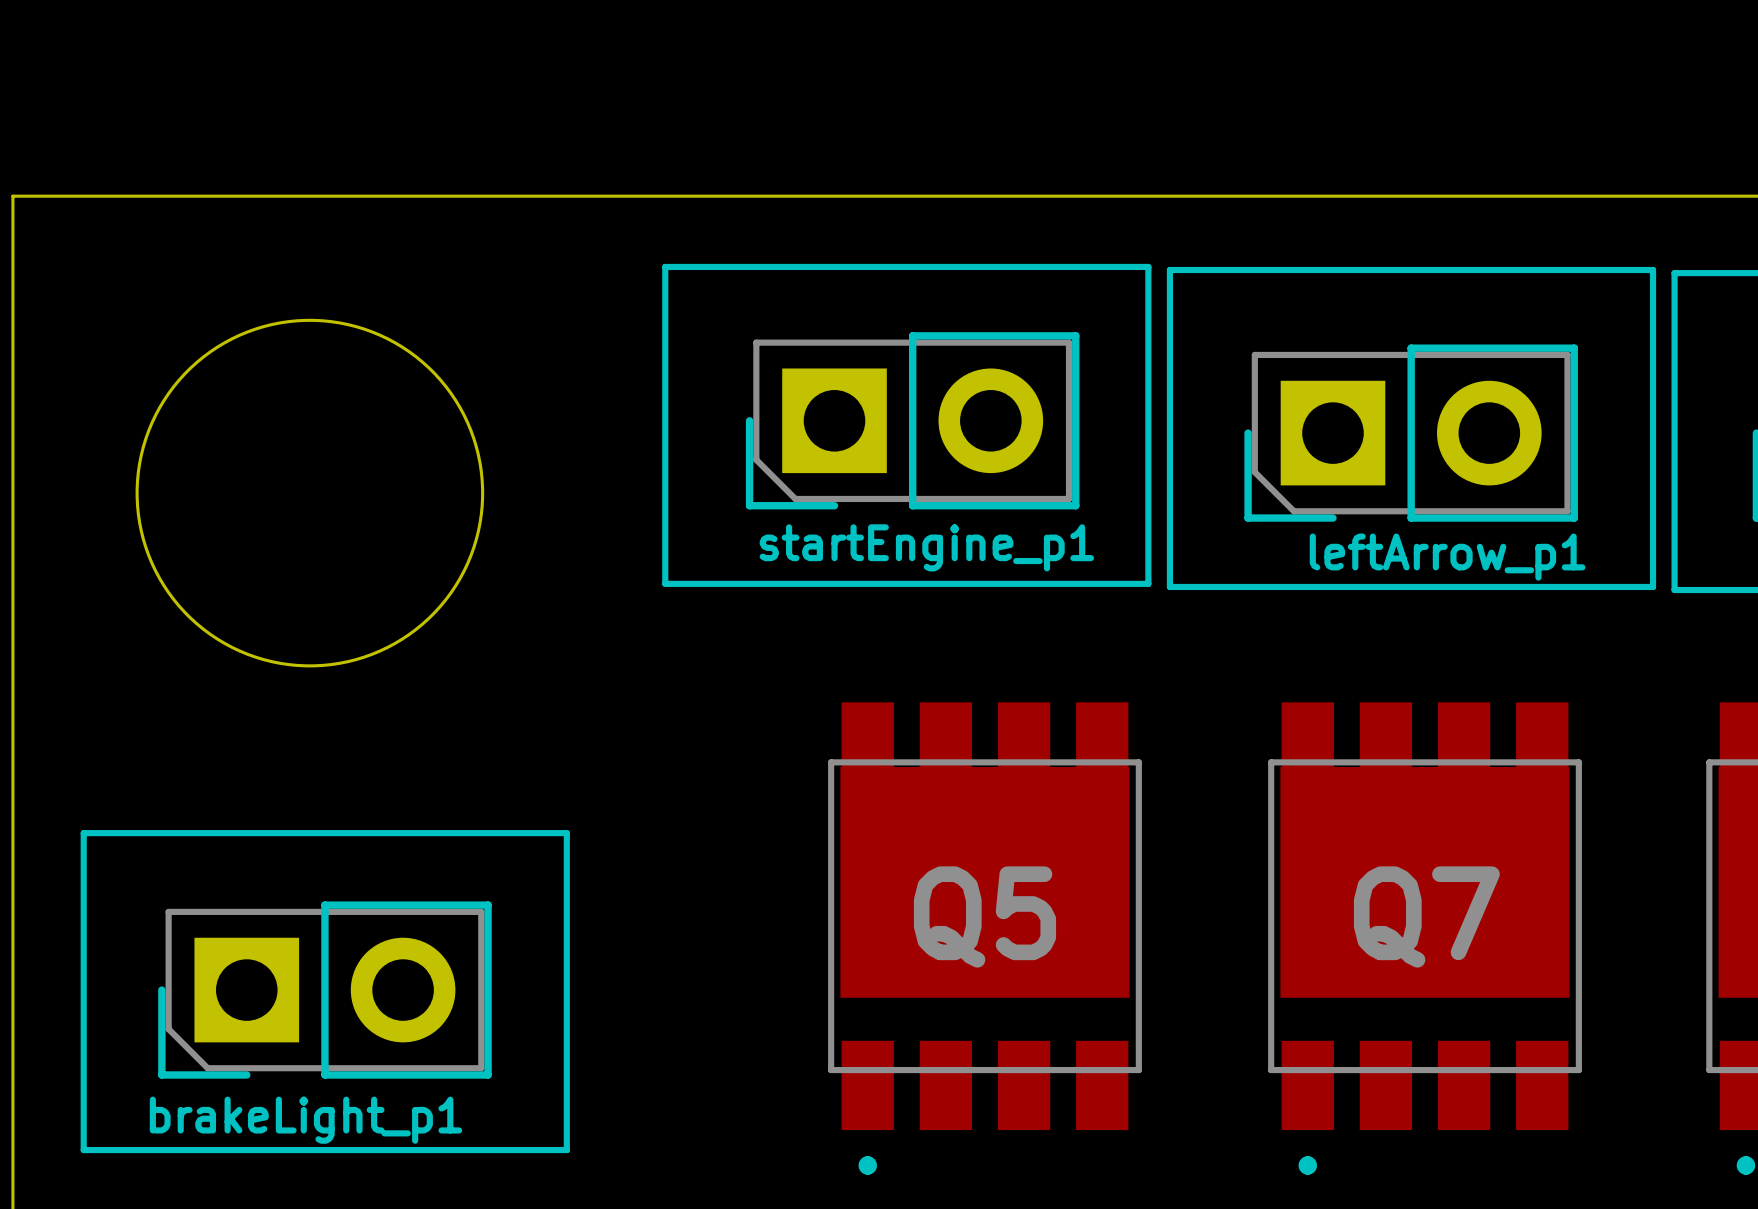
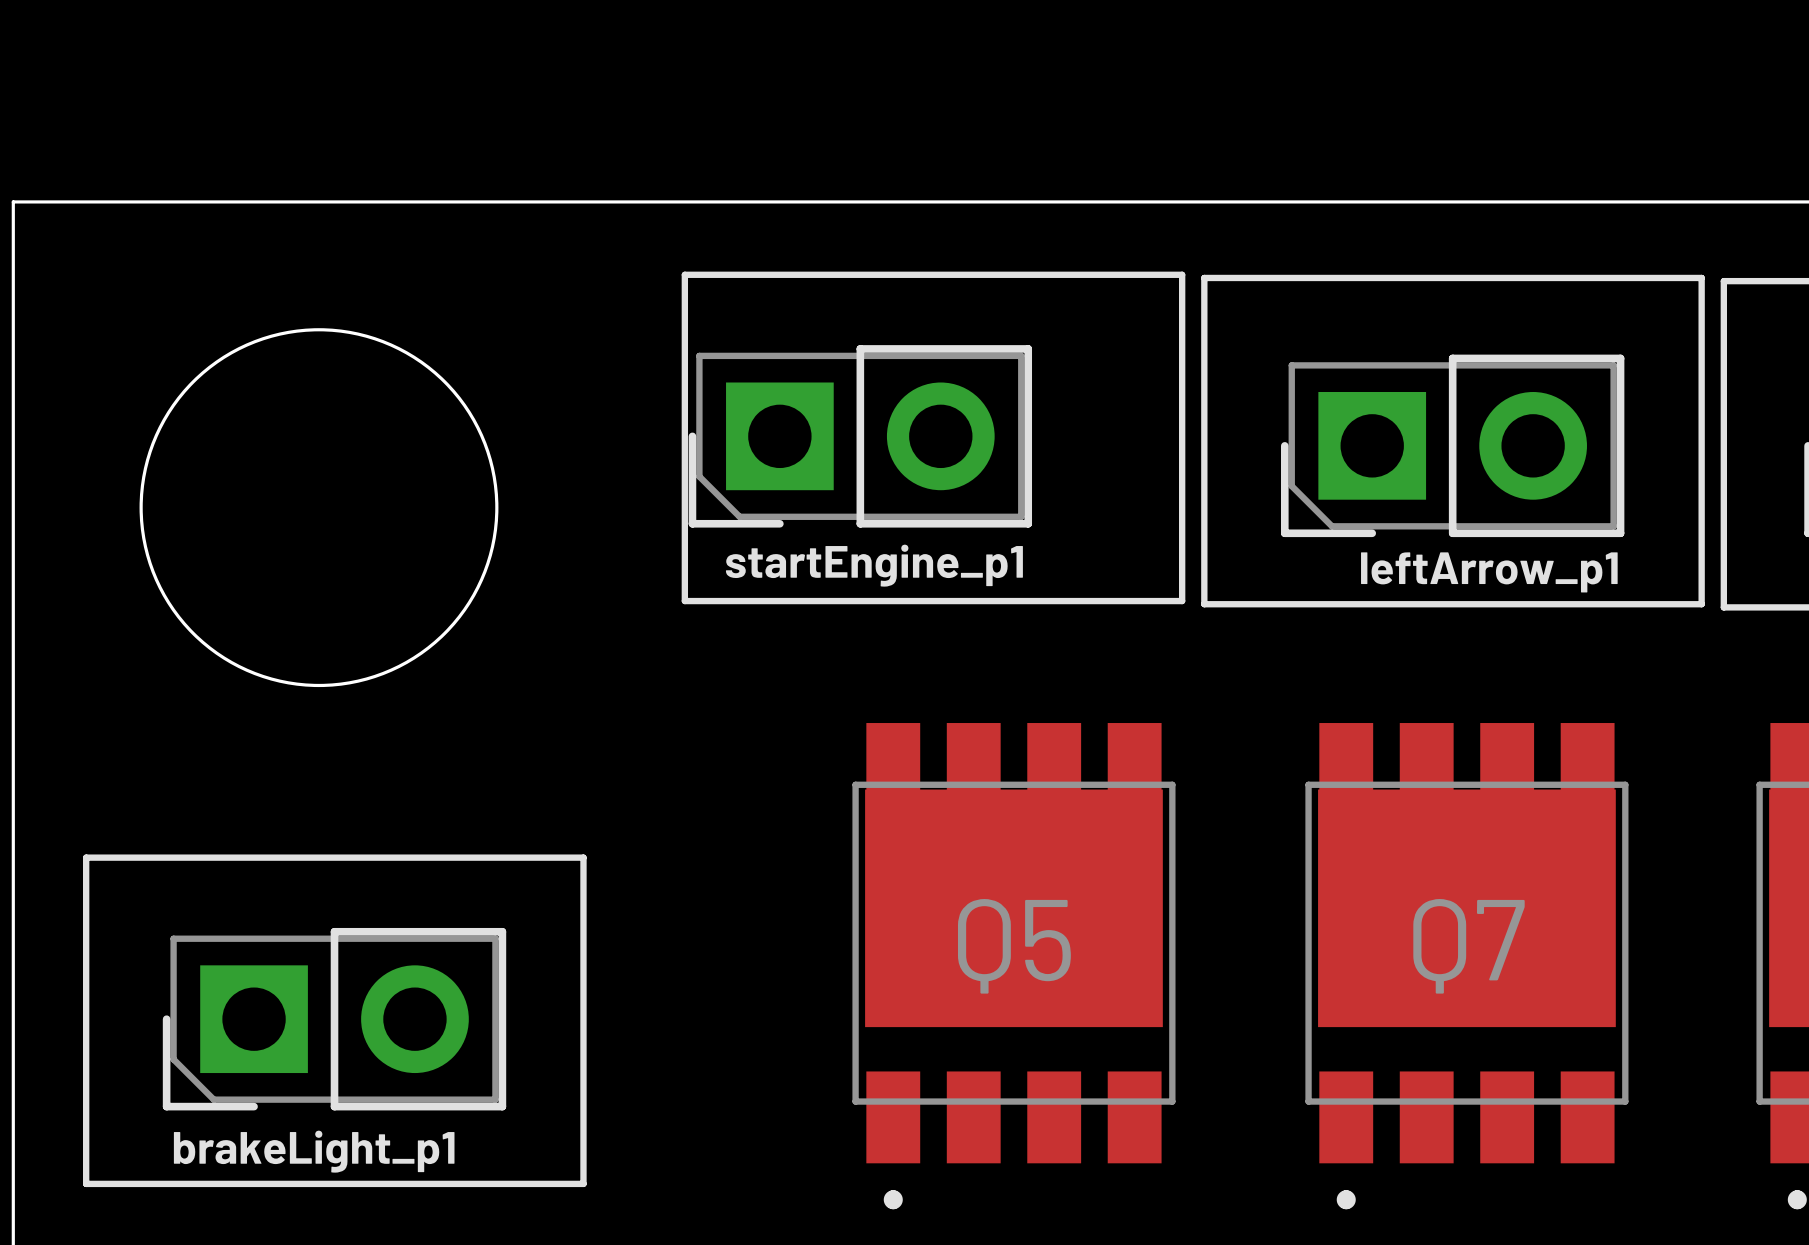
startEngine_p1 position: (912, 420) -> (860, 436)

